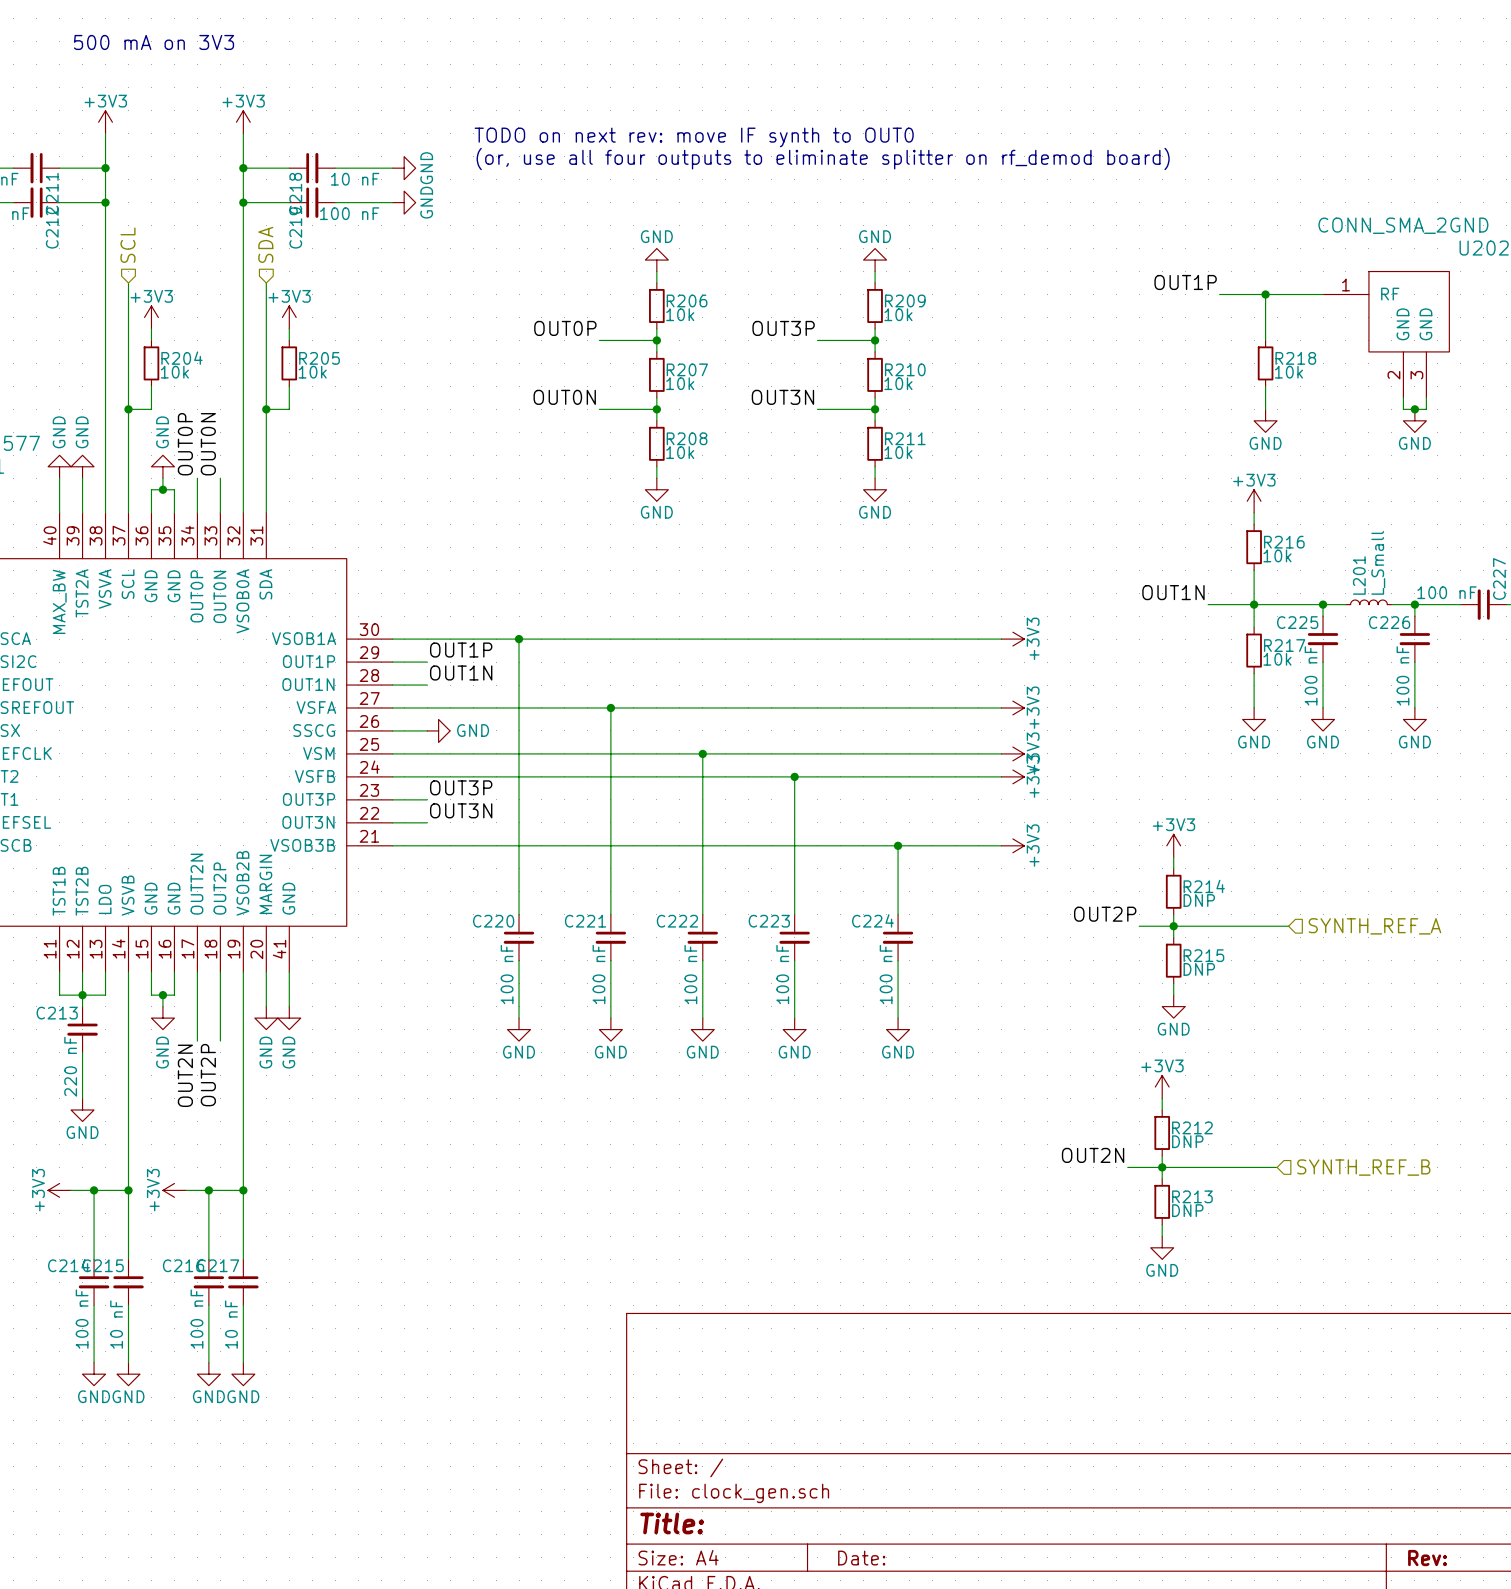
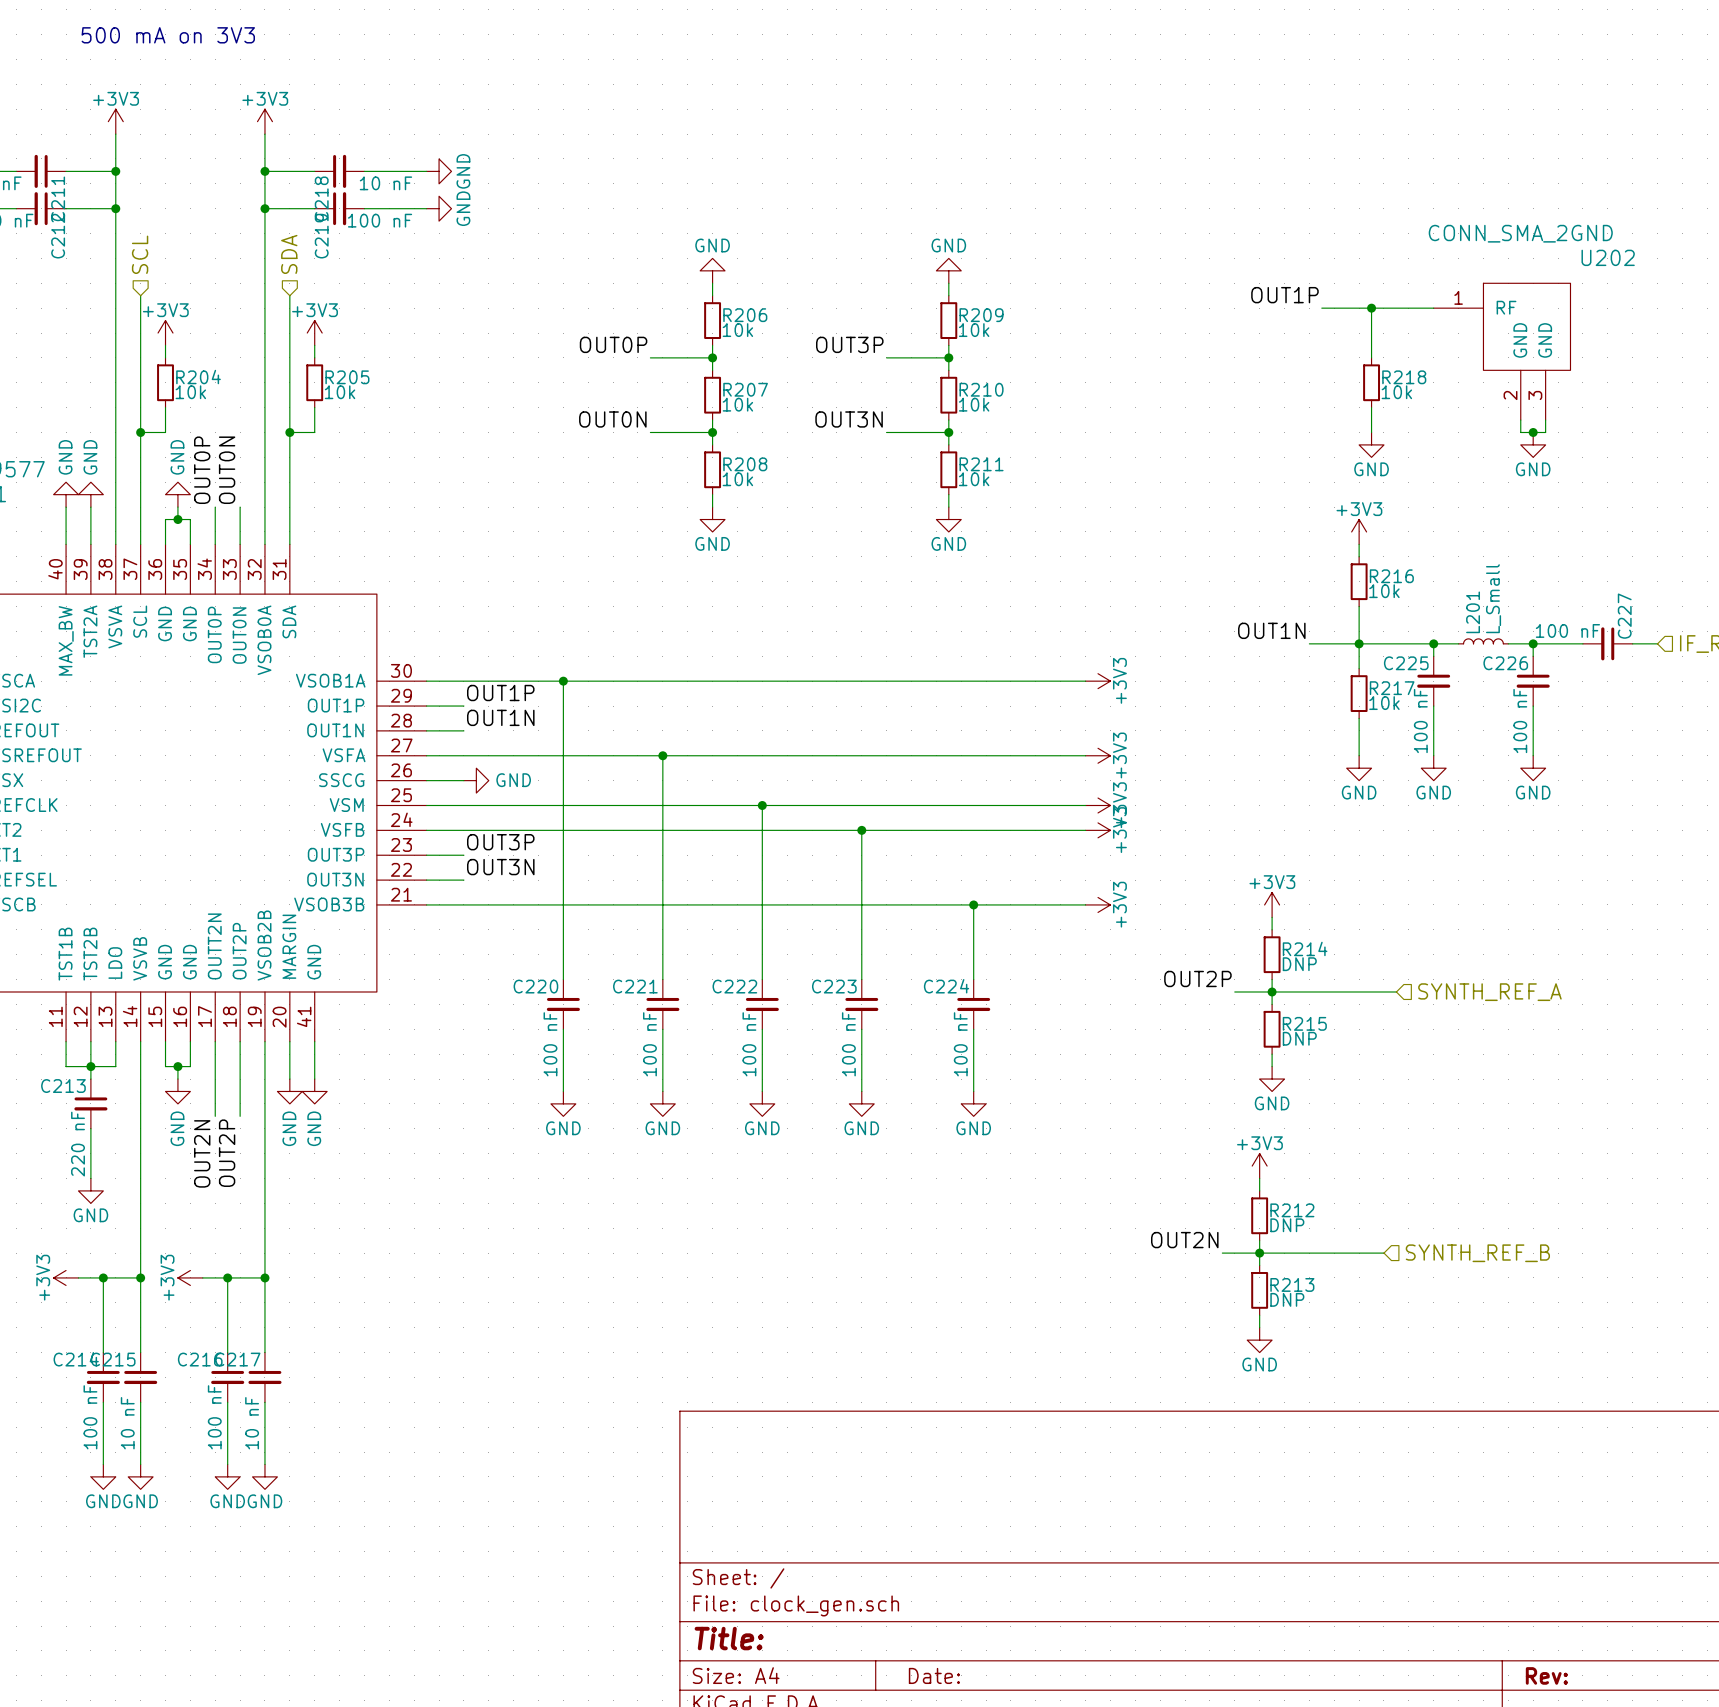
text: TODO on next rev: move IF synth to OUT0 (694, 137) -> none
text: (or, use all four outputs to eliminate splitter on rf_demod board) (823, 158) -> none

